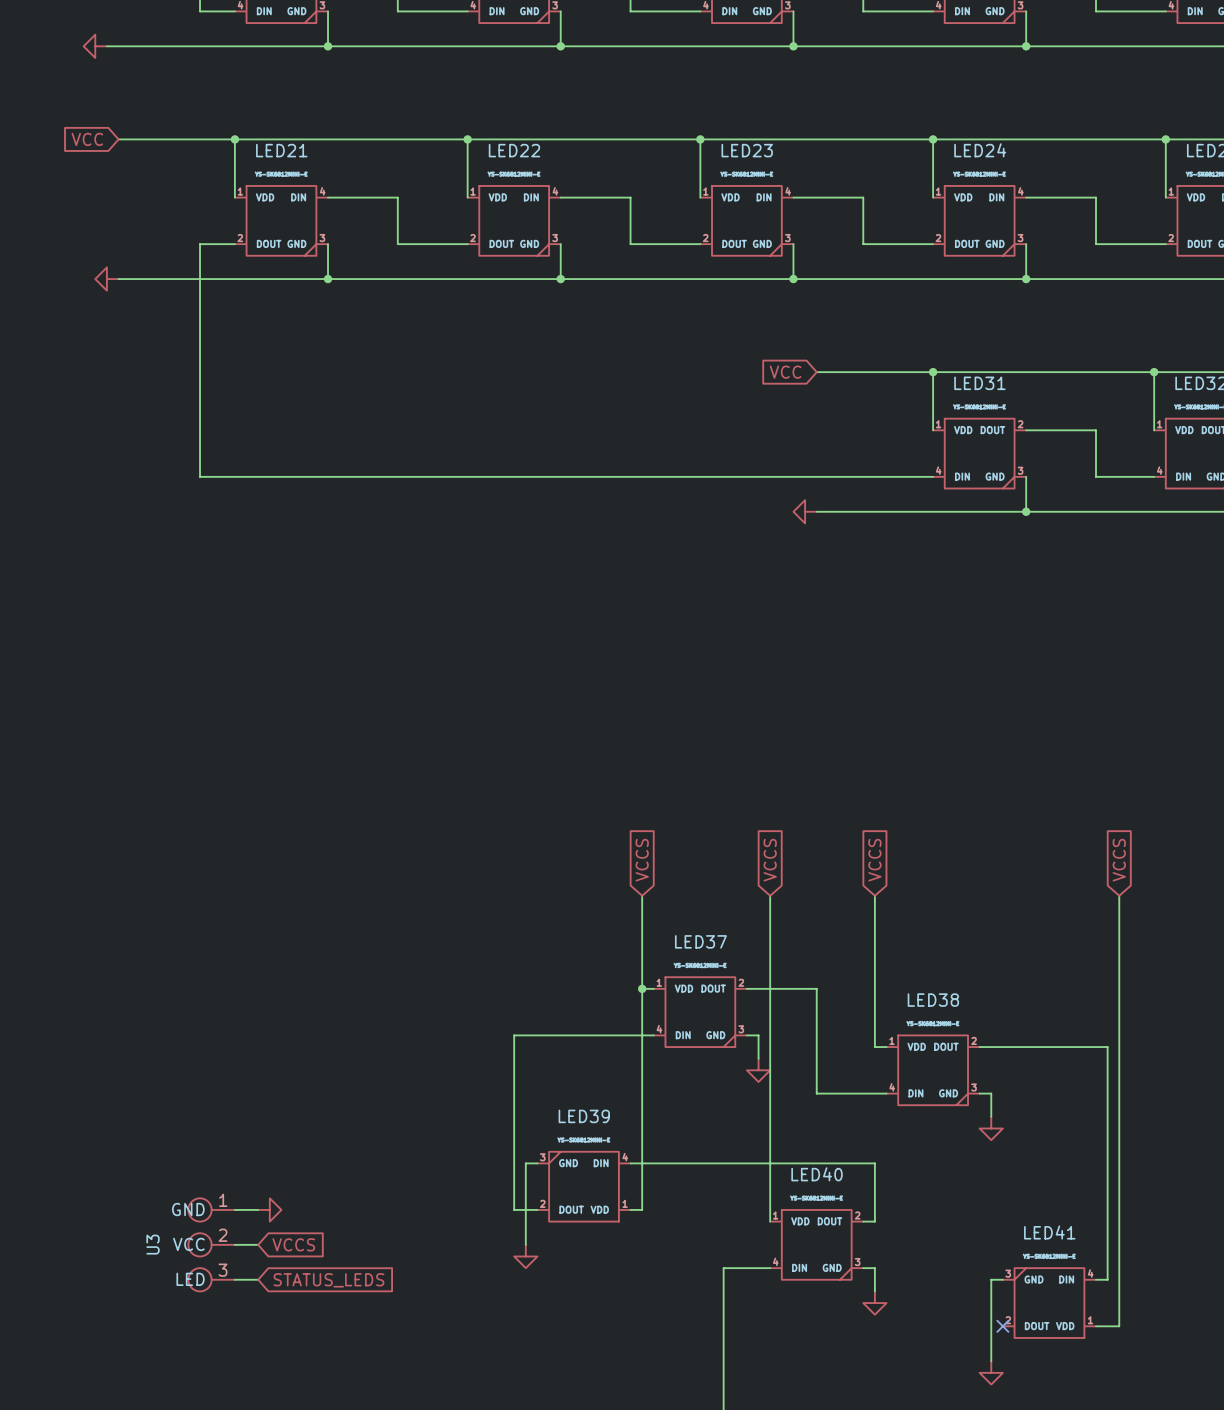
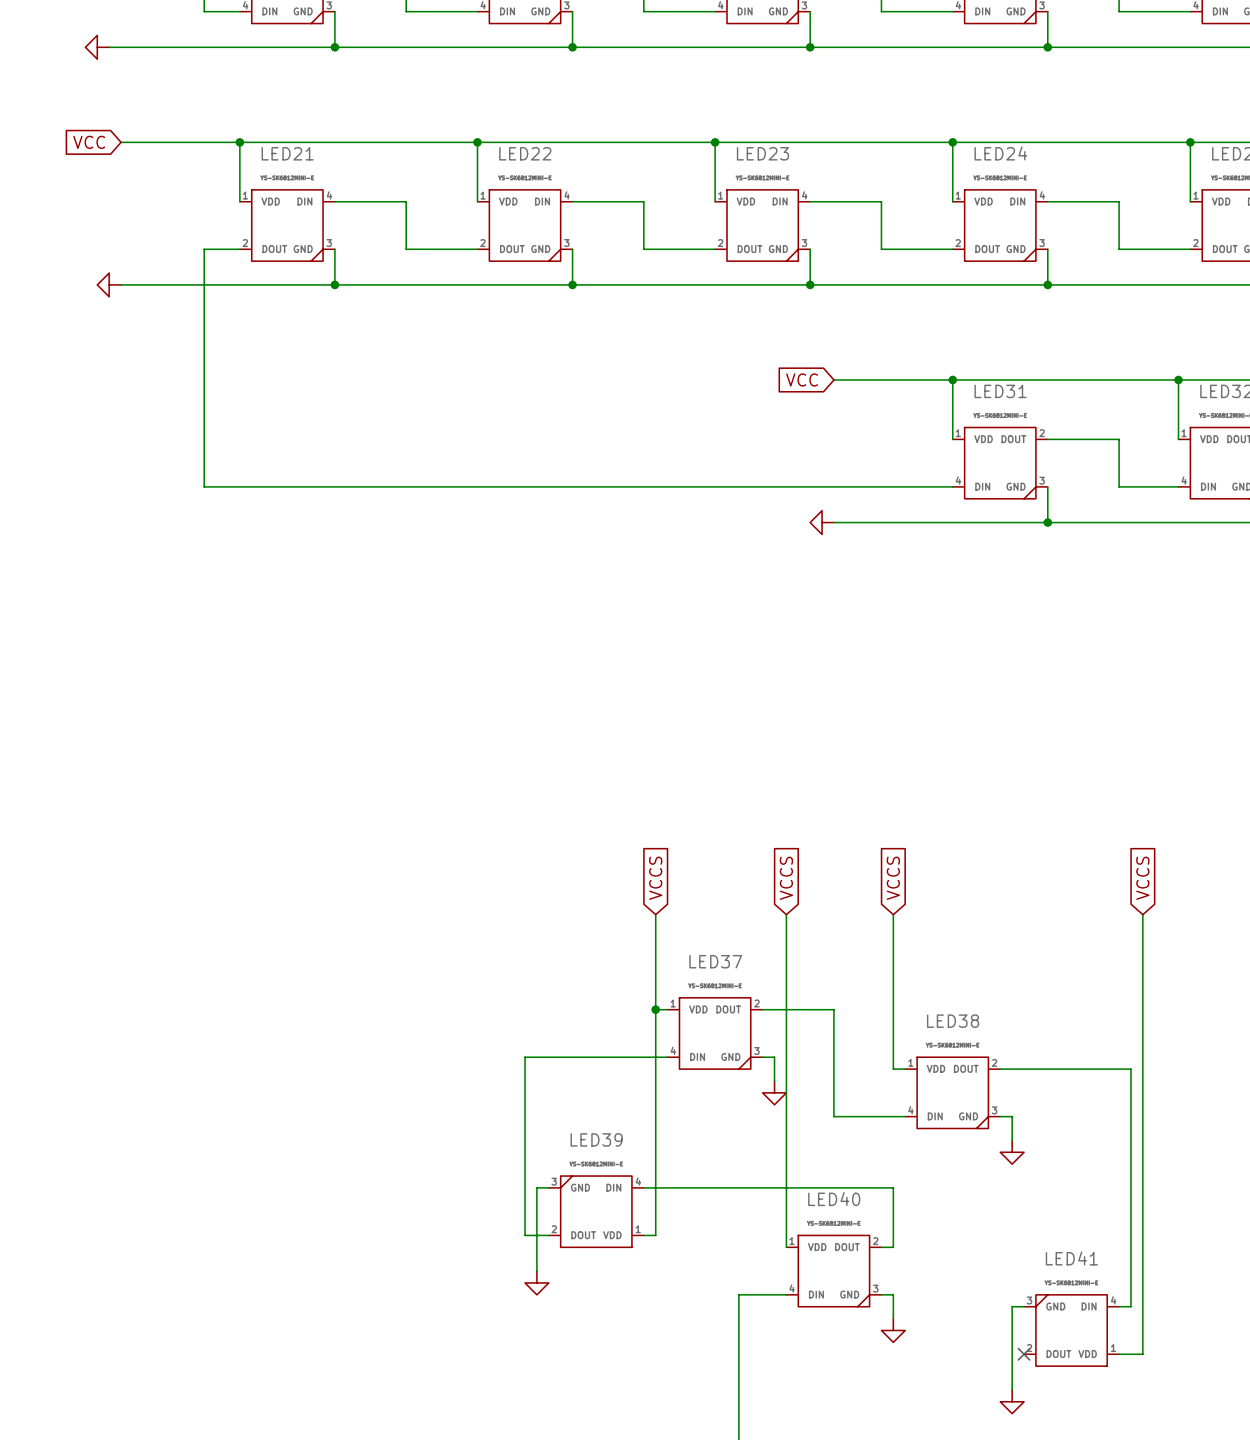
wire: (234, 1209) (258, 1209) -> none
power symbol: (269, 1209) -> none
U3: (211, 1244) -> none
wire: (234, 1244) (258, 1244) -> none
global label: VCCS (293, 1244) -> none
wire: (234, 1279) (258, 1279) -> none
global label: STATUS_LEDS (328, 1280) -> none

